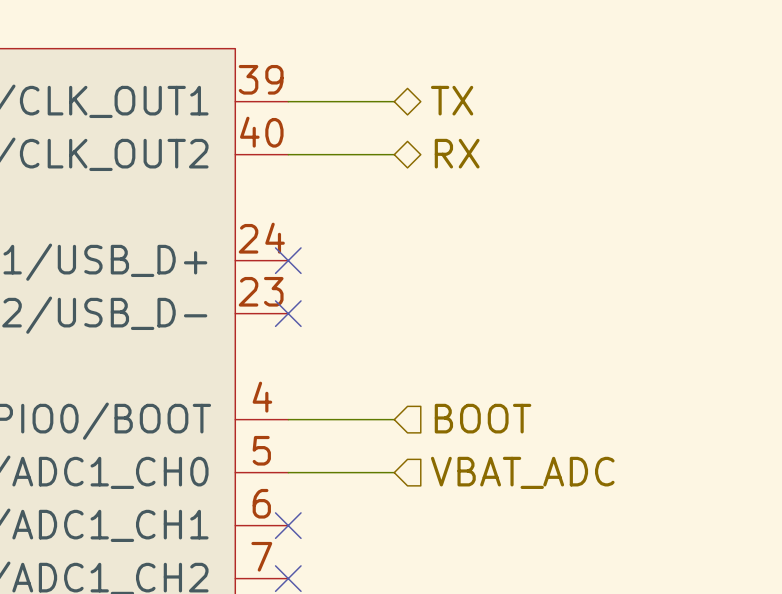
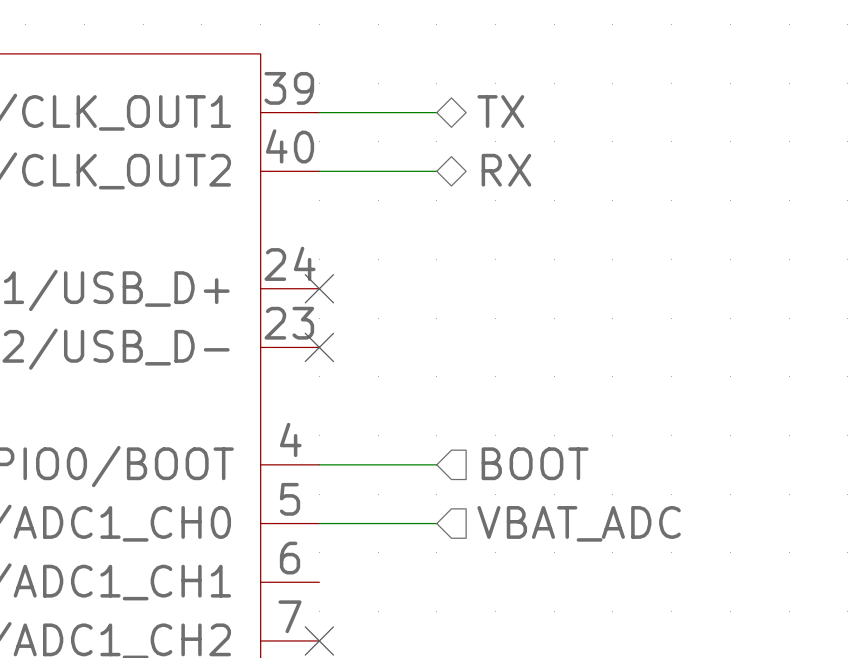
no-connect mark: (288, 525) -> none

